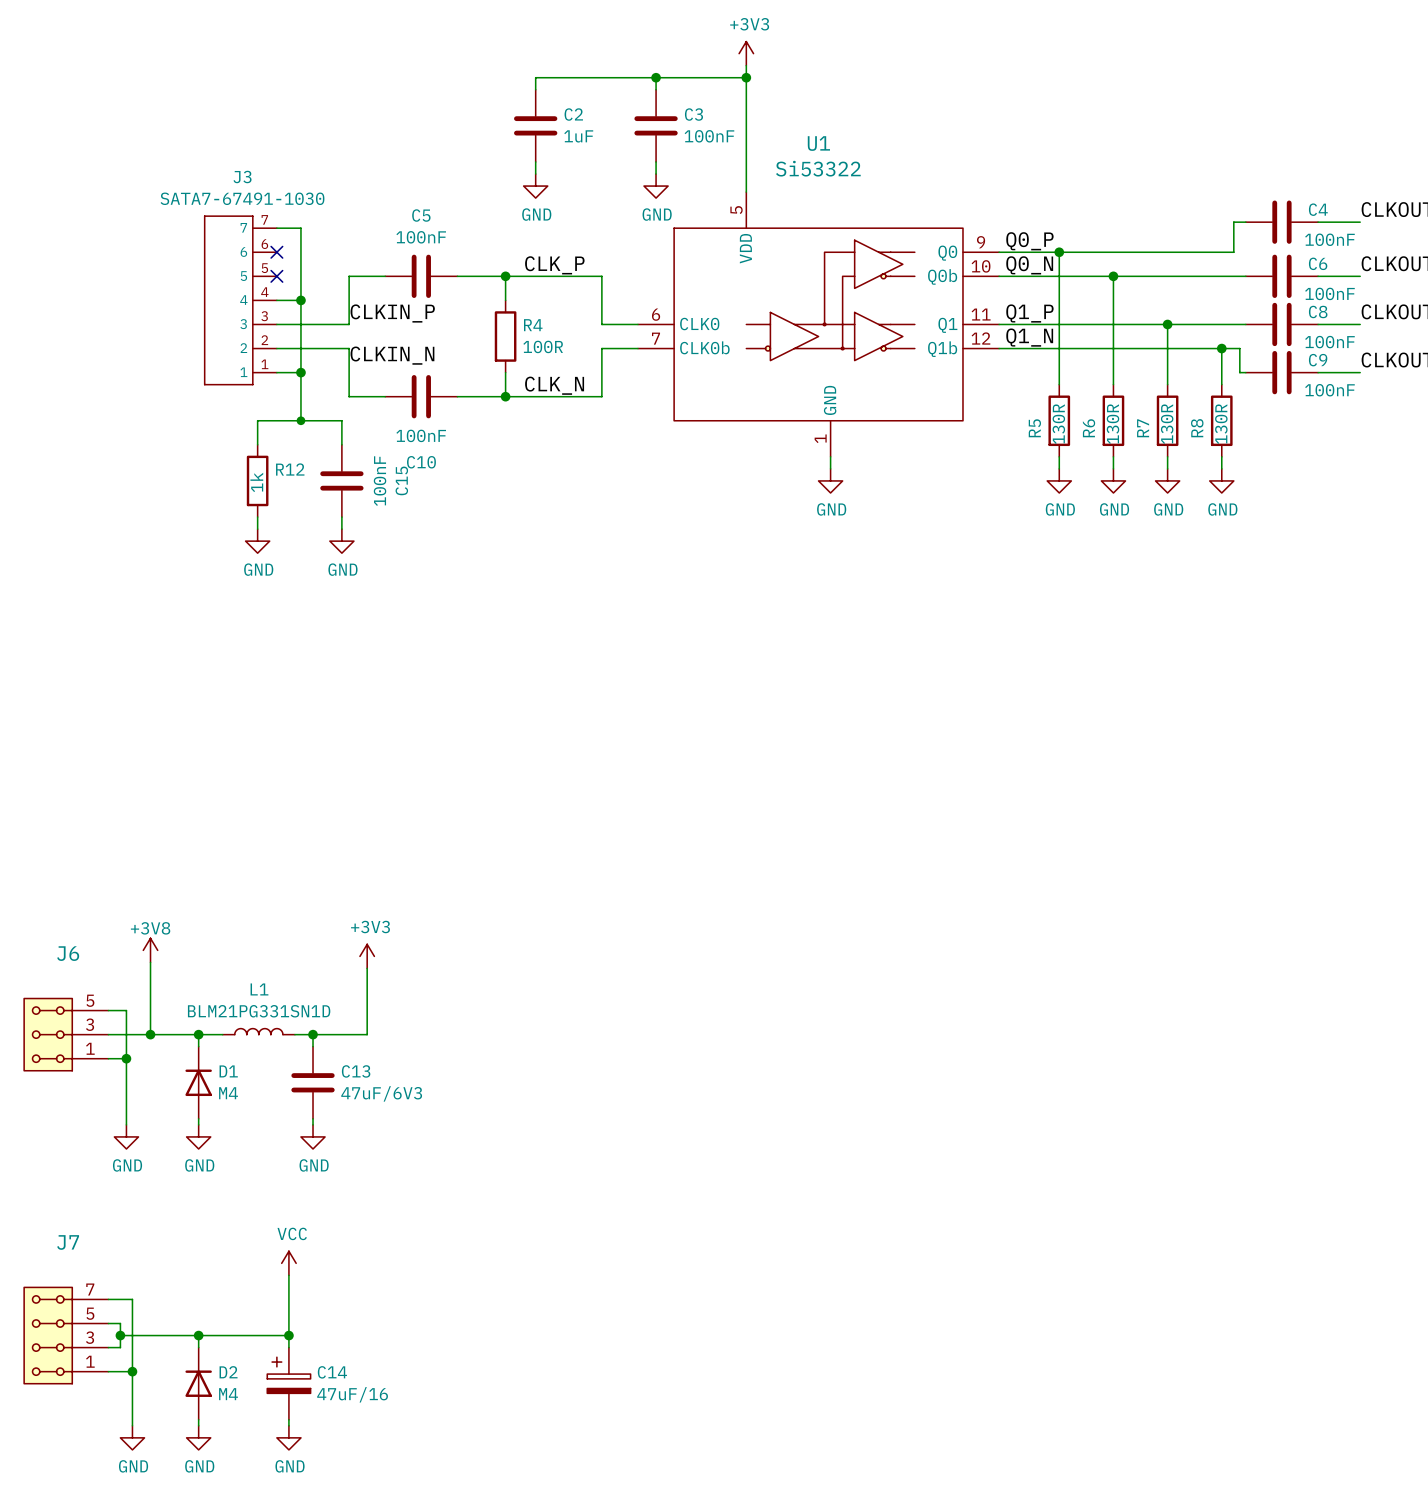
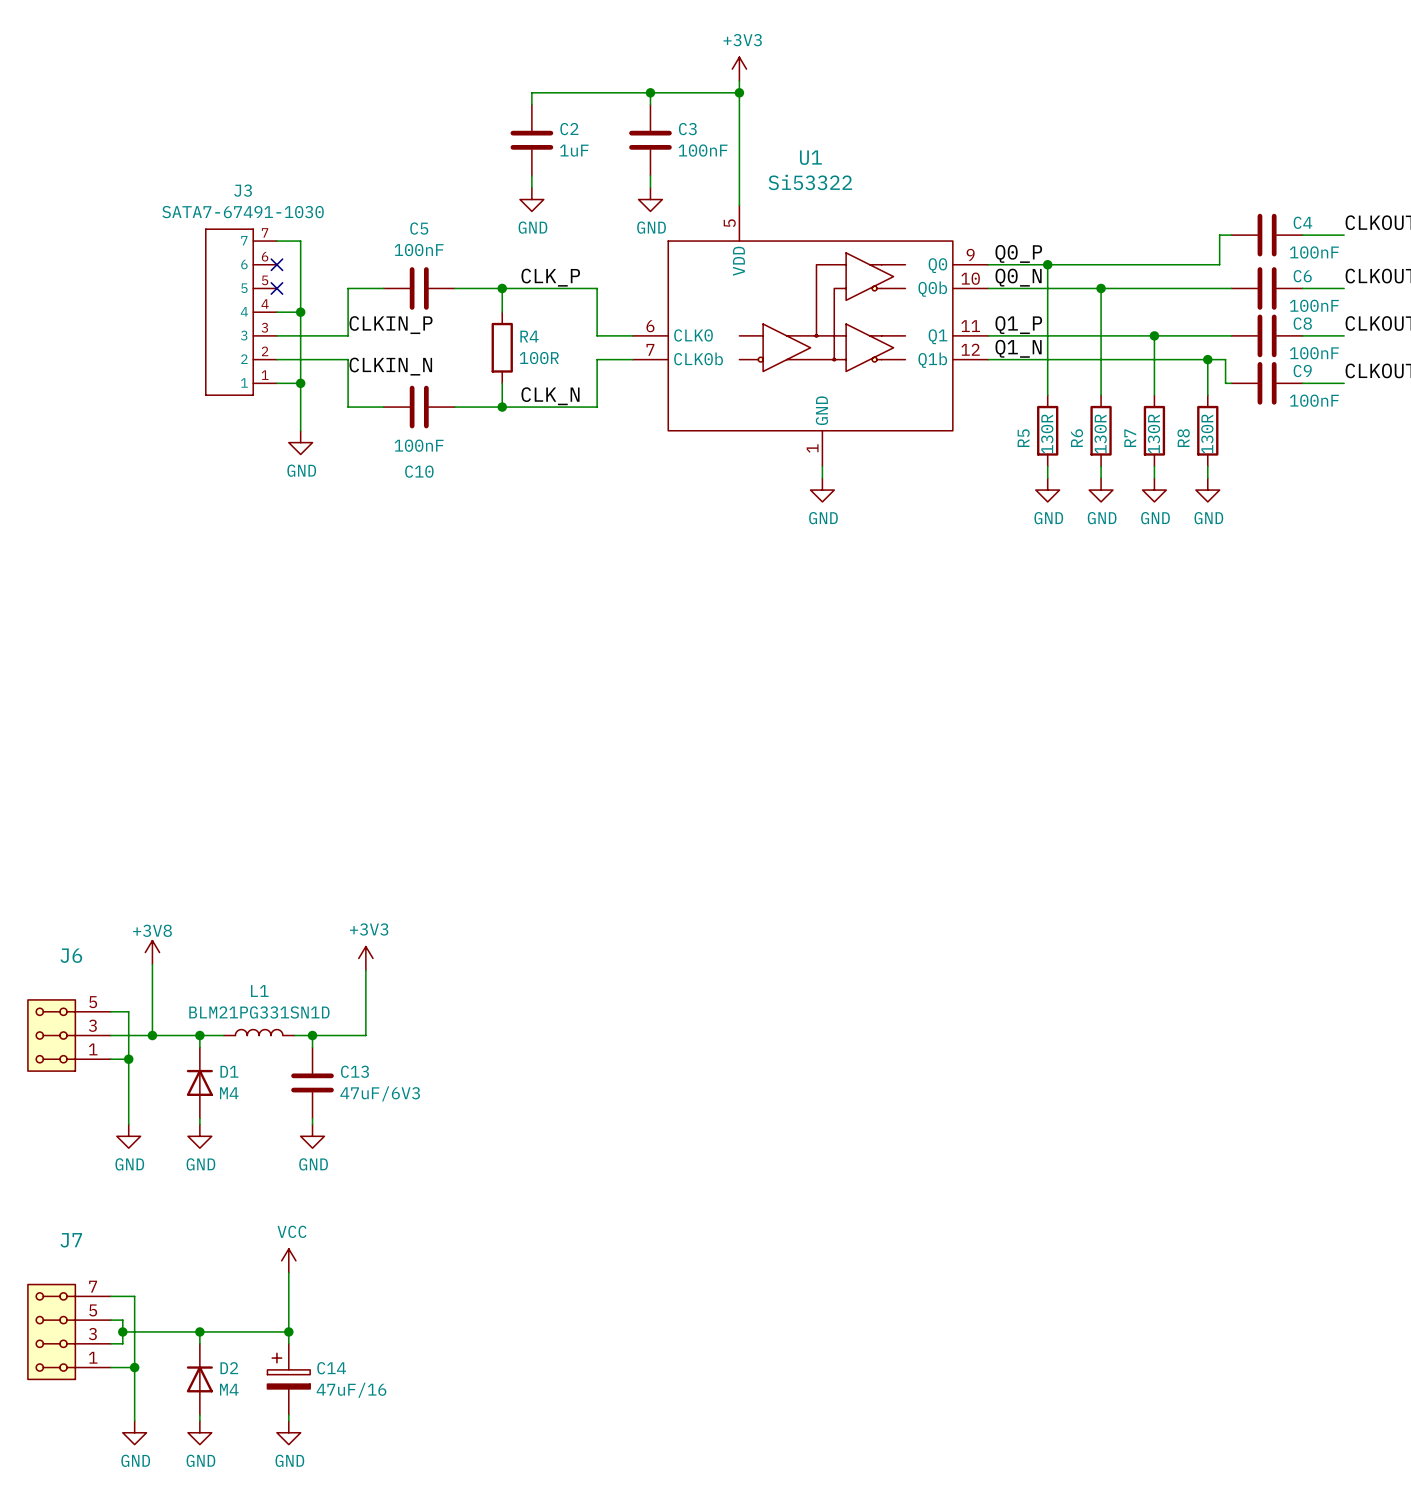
junction: (300, 420) -> none
power symbol: none -> GND (300, 442)
wire: (257, 444) (257, 420) (341, 420) (341, 444) -> none
R12: 1k (257, 480) -> none
C15: 100nF (341, 480) -> none
wire: (257, 517) (257, 529) -> none
wire: (341, 517) (341, 529) -> none
power symbol: GND (257, 541) -> none
power symbol: GND (341, 541) -> none

